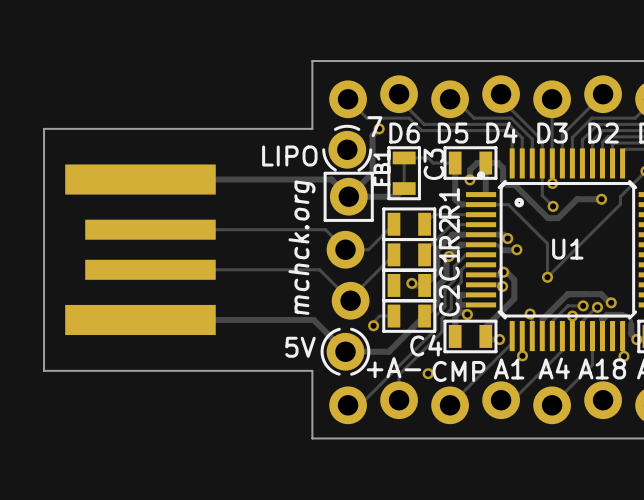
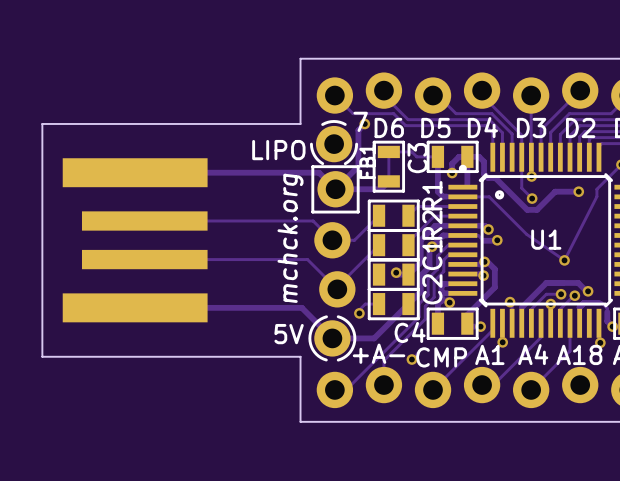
track: (620, 204) (547, 277) (547, 243) -> (596, 196) (564, 260) (526, 234)
via position: (547, 277) -> (564, 260)

